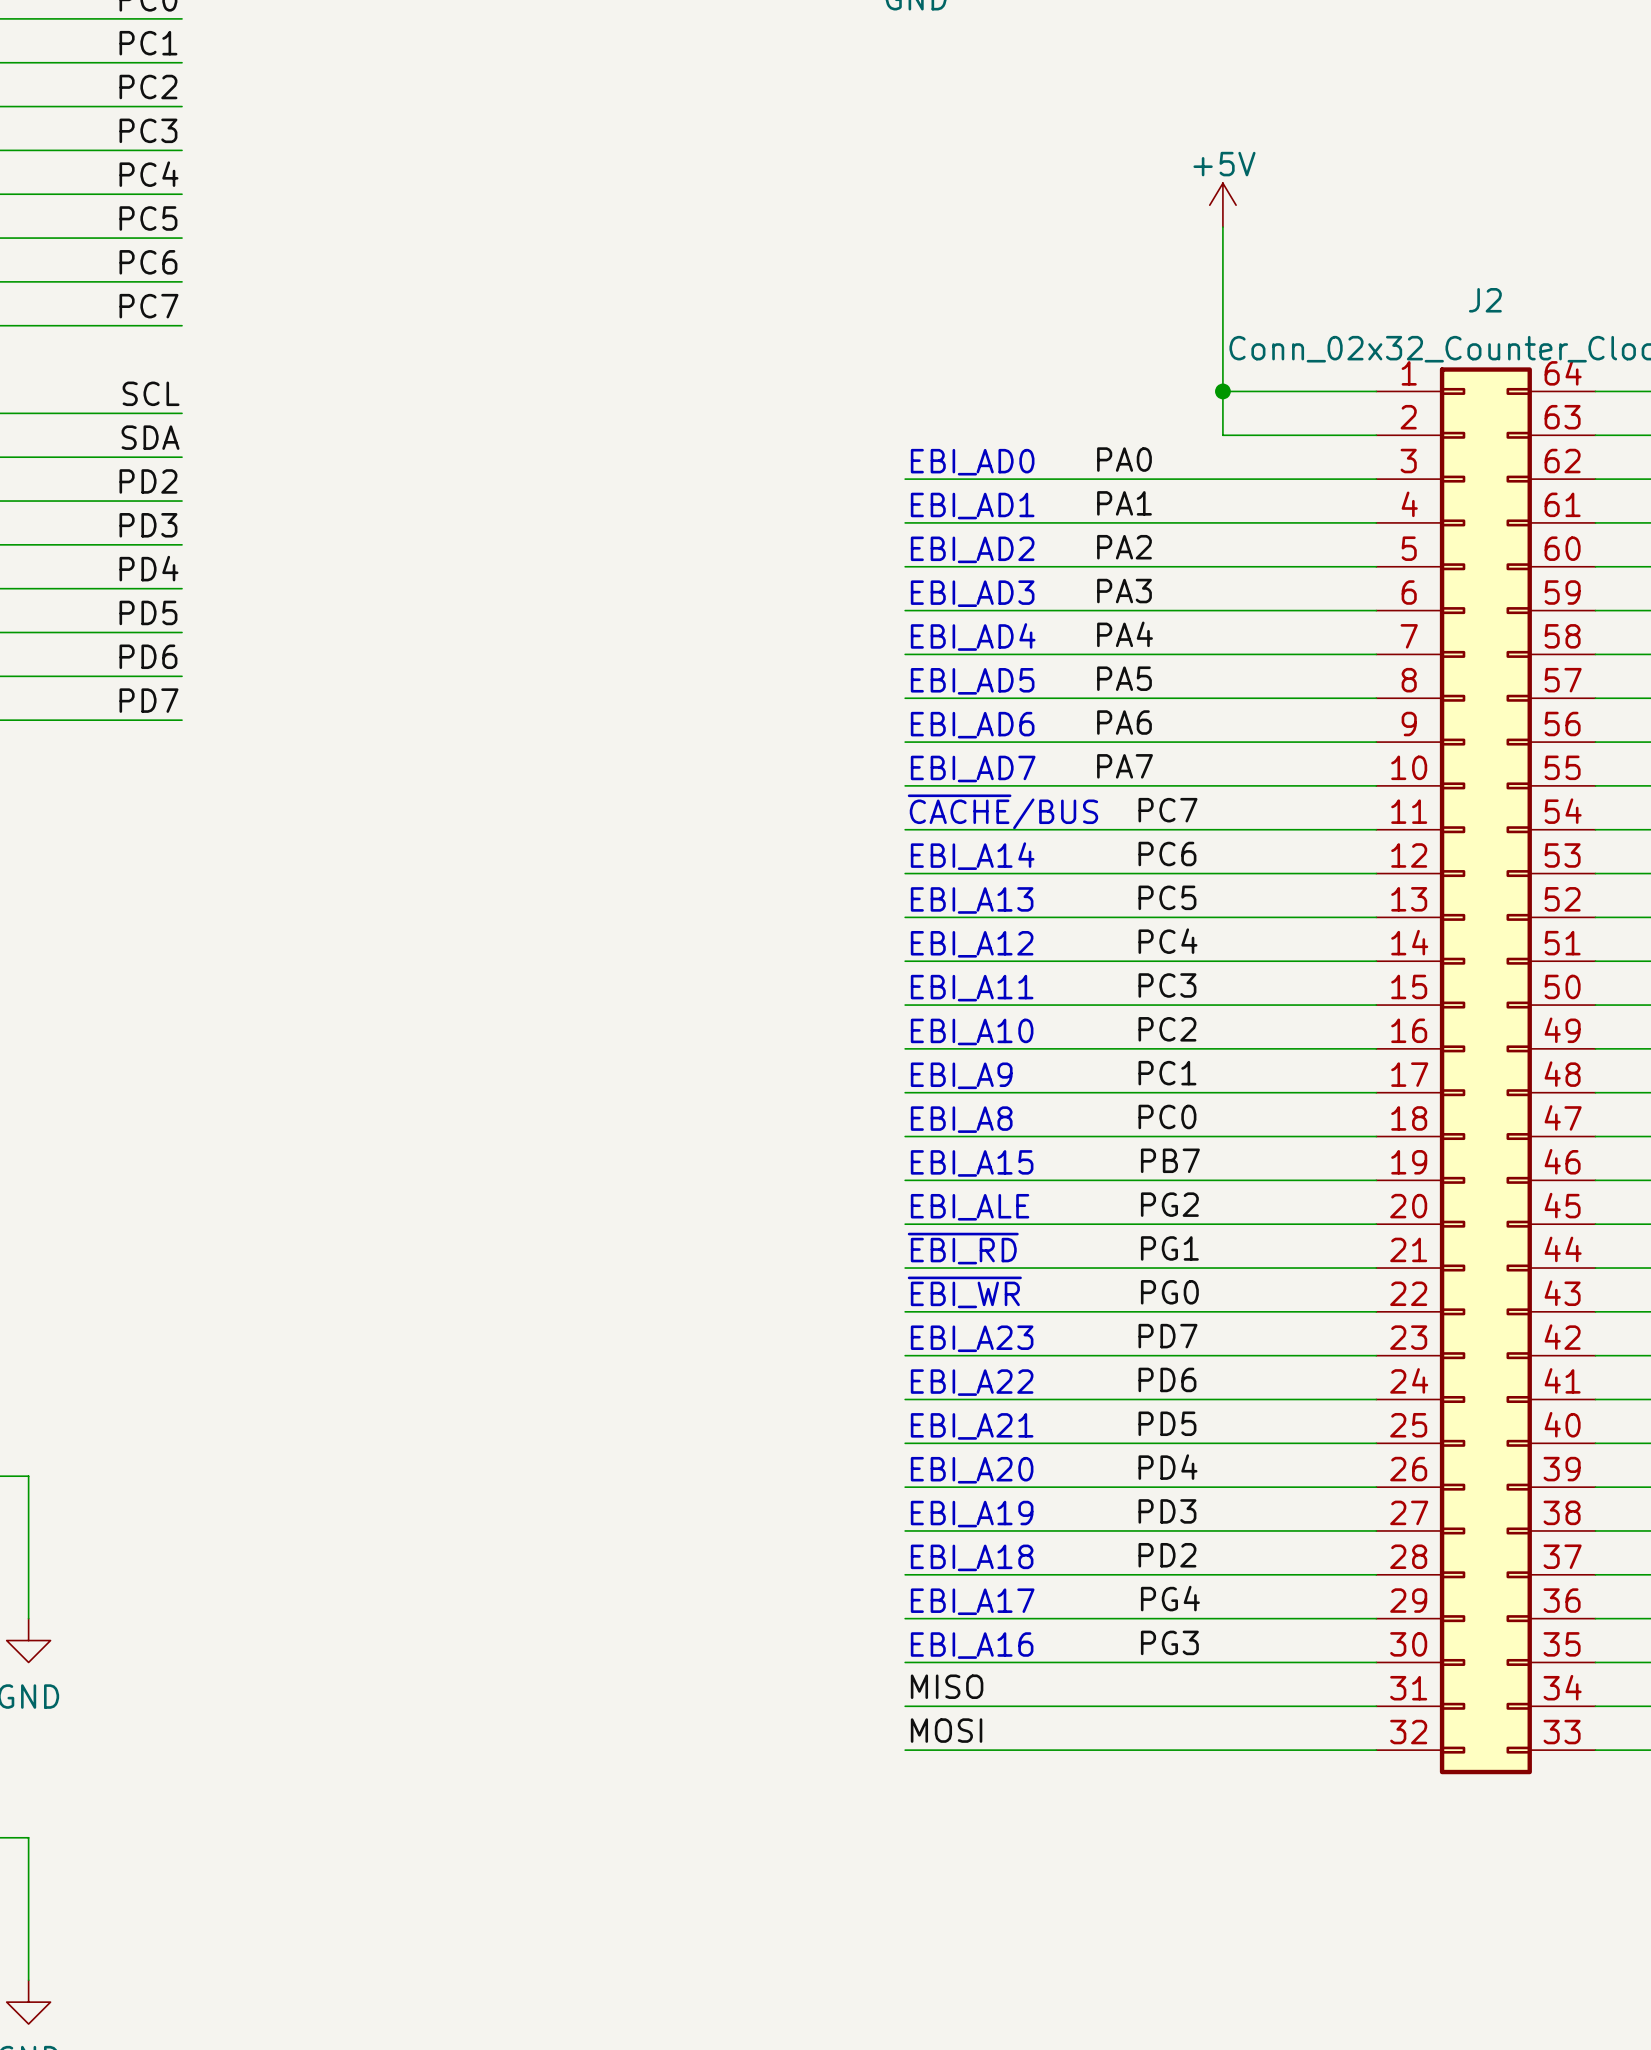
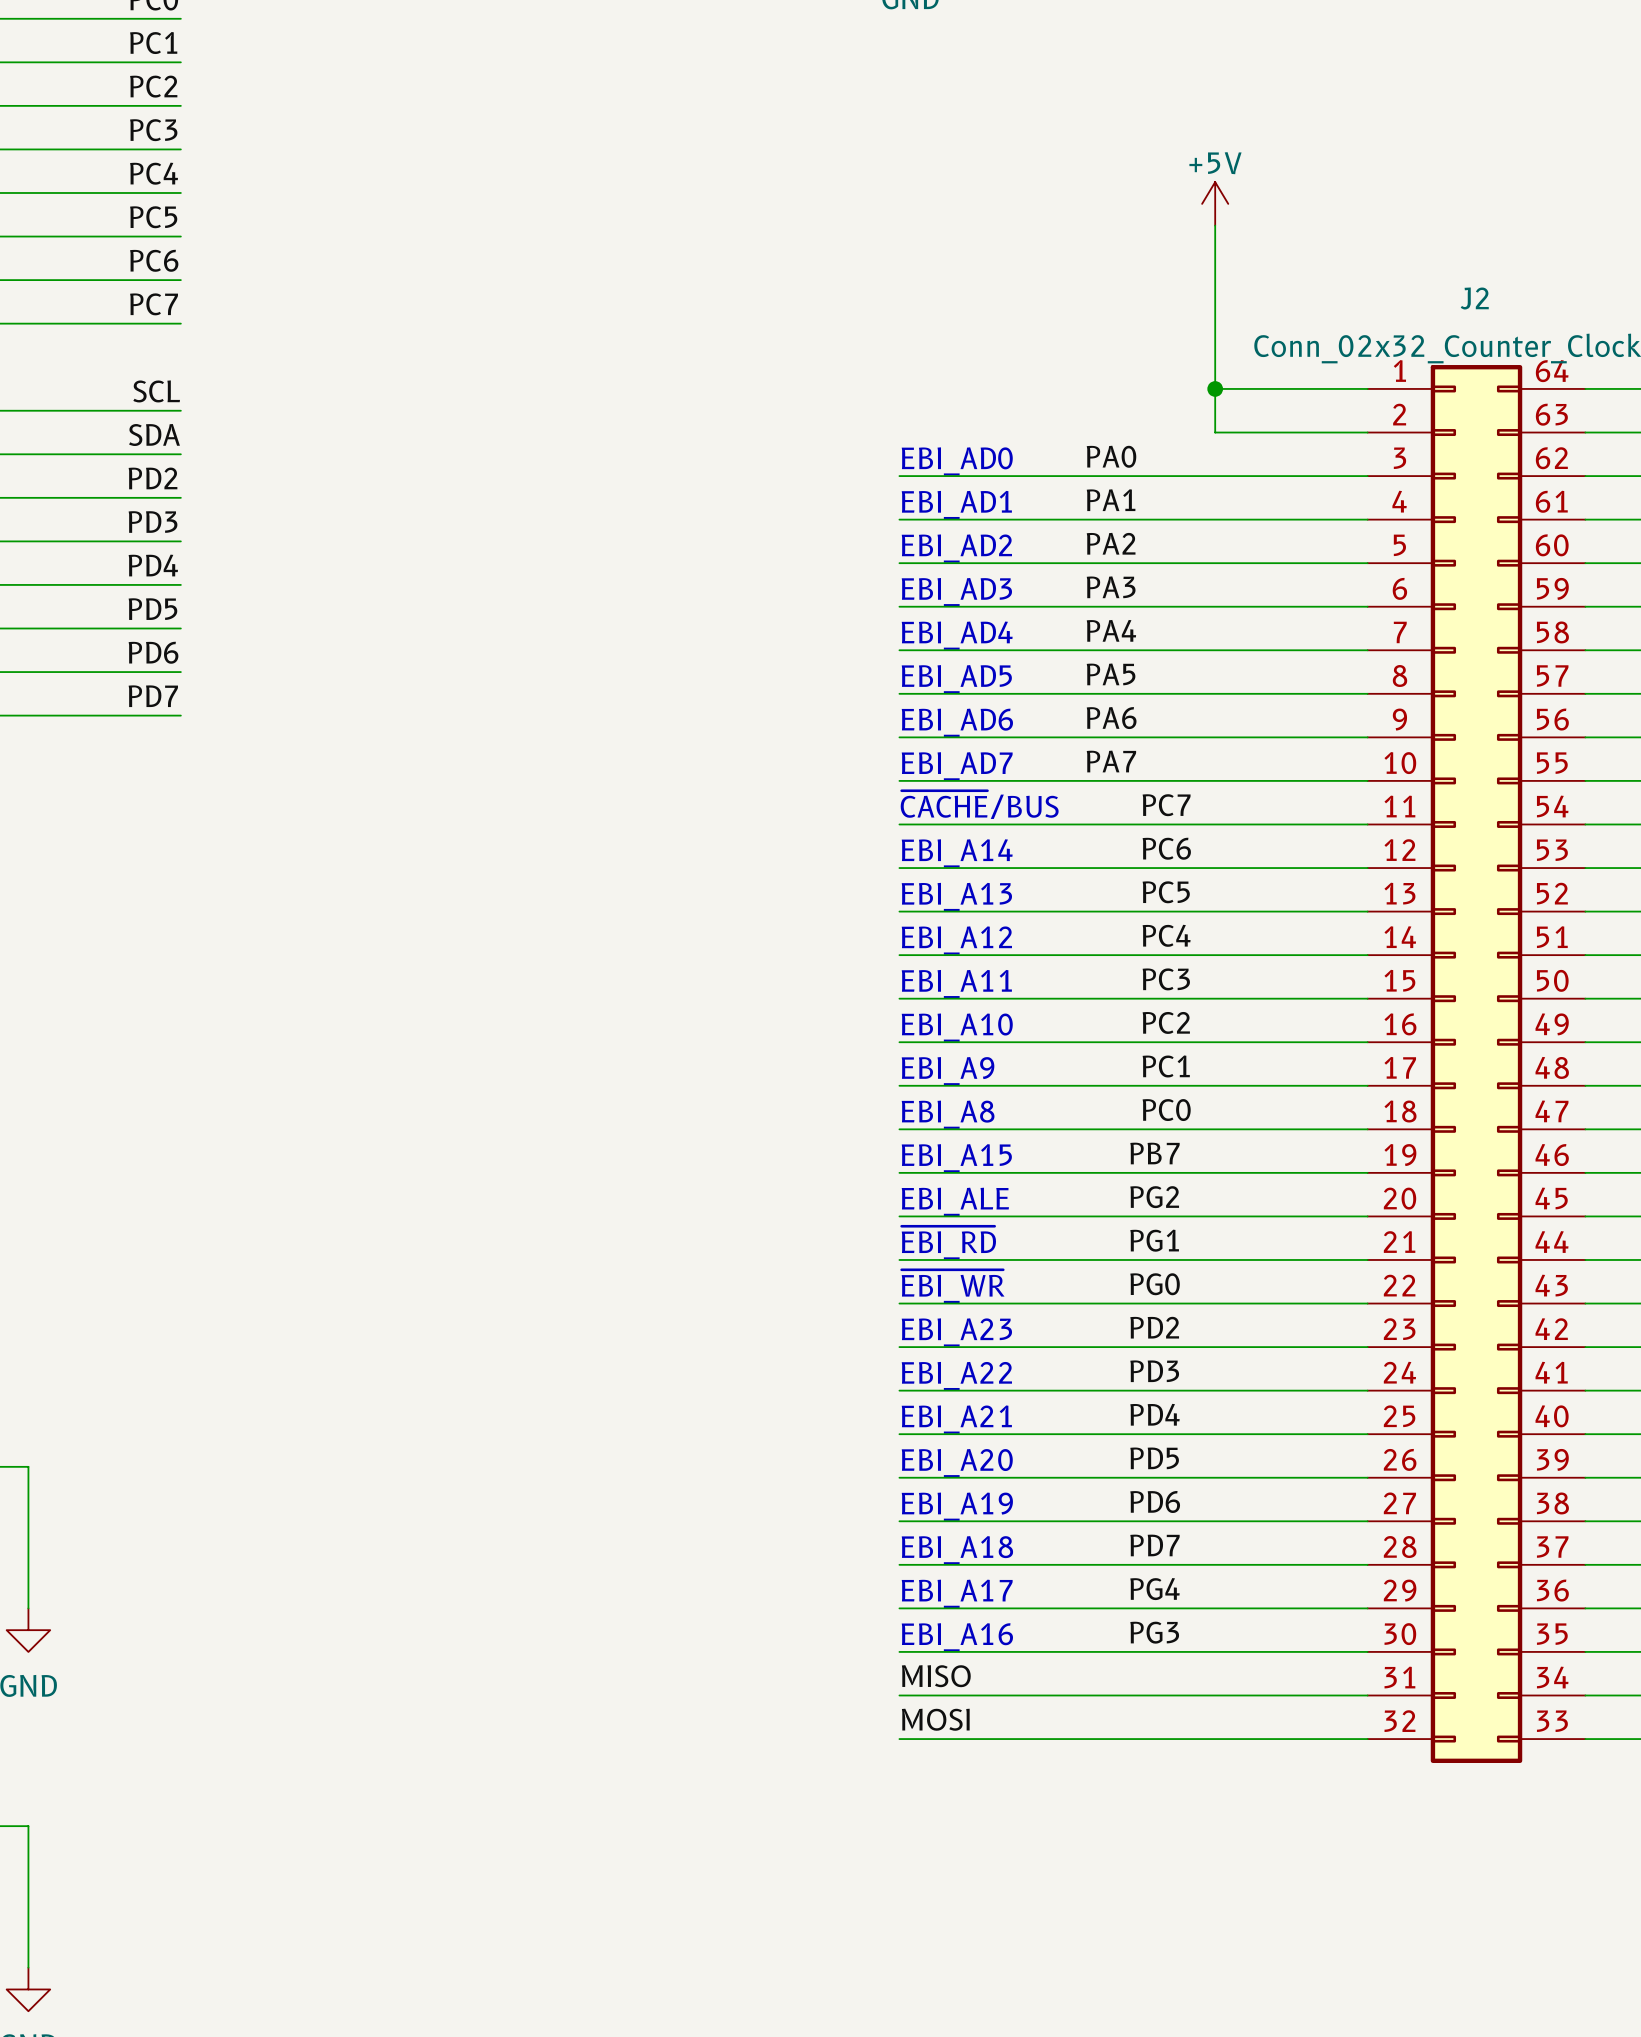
label position: PD7 (1167, 1336) -> PD7 (1154, 1545)
label position: PD6 (1167, 1379) -> PD6 (1155, 1502)
label position: PD5 (1167, 1423) -> PD5 (1154, 1458)
label position: PD4 (1167, 1467) -> PD4 (1154, 1414)
label position: PD3 (1167, 1511) -> PD3 (1154, 1371)
label position: PD2 (1167, 1555) -> PD2 (1154, 1327)

